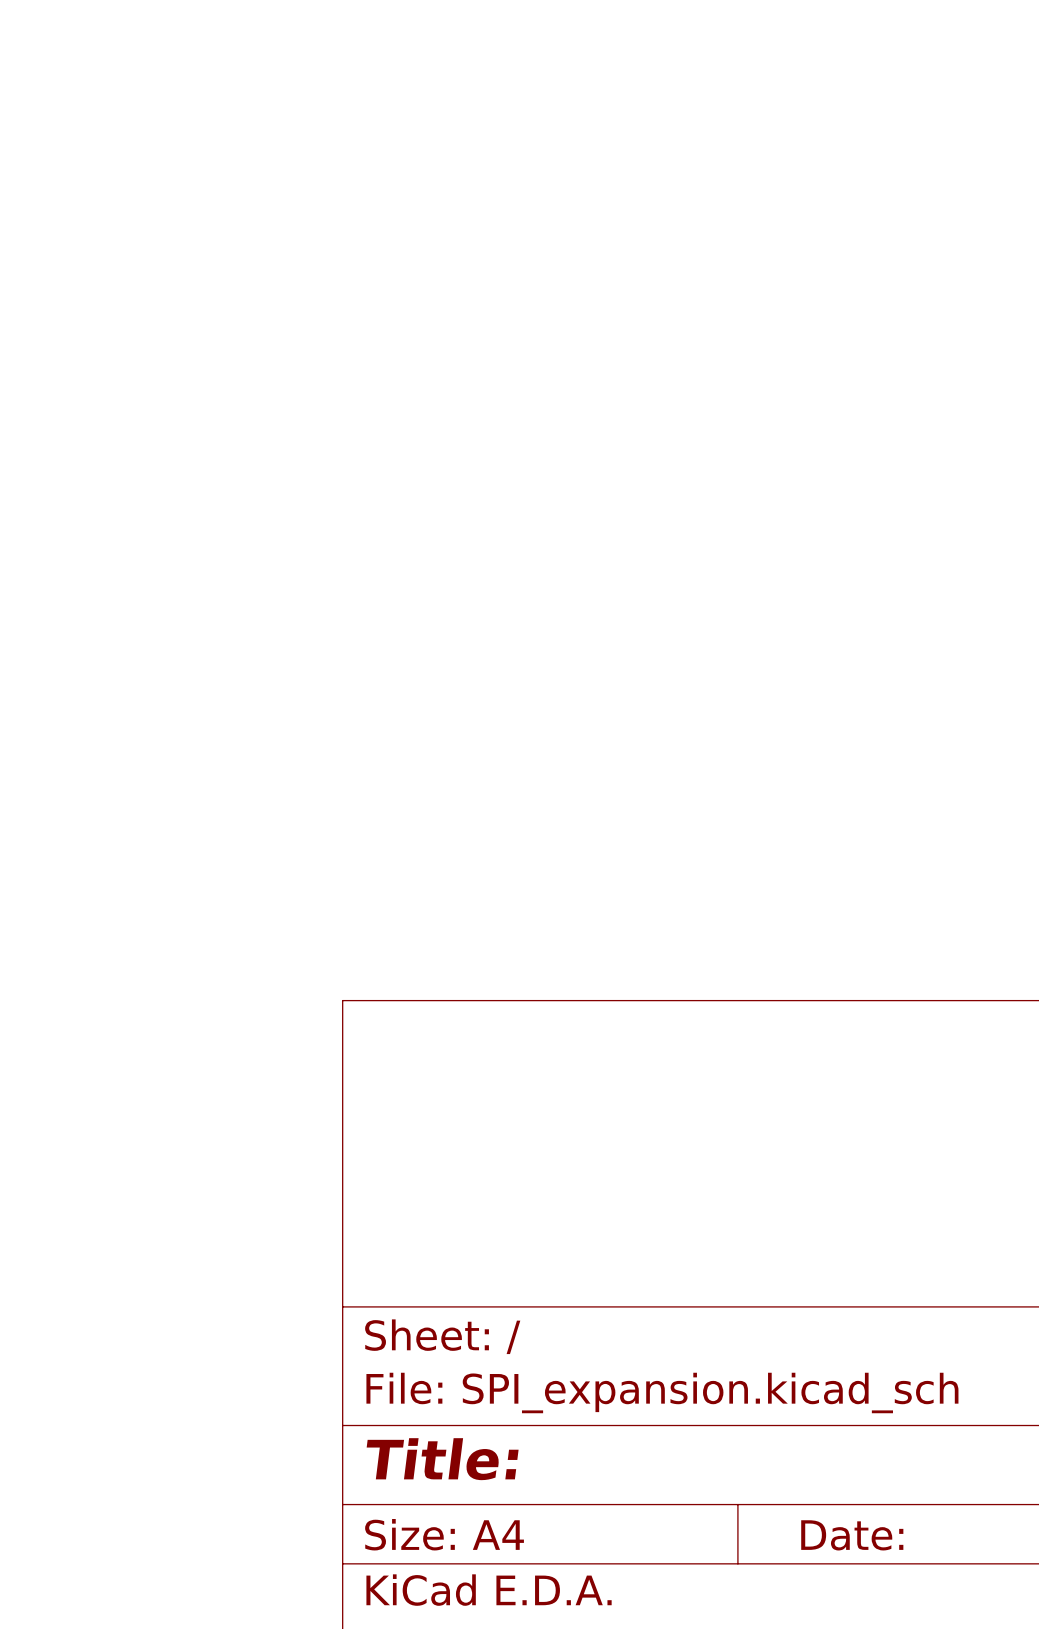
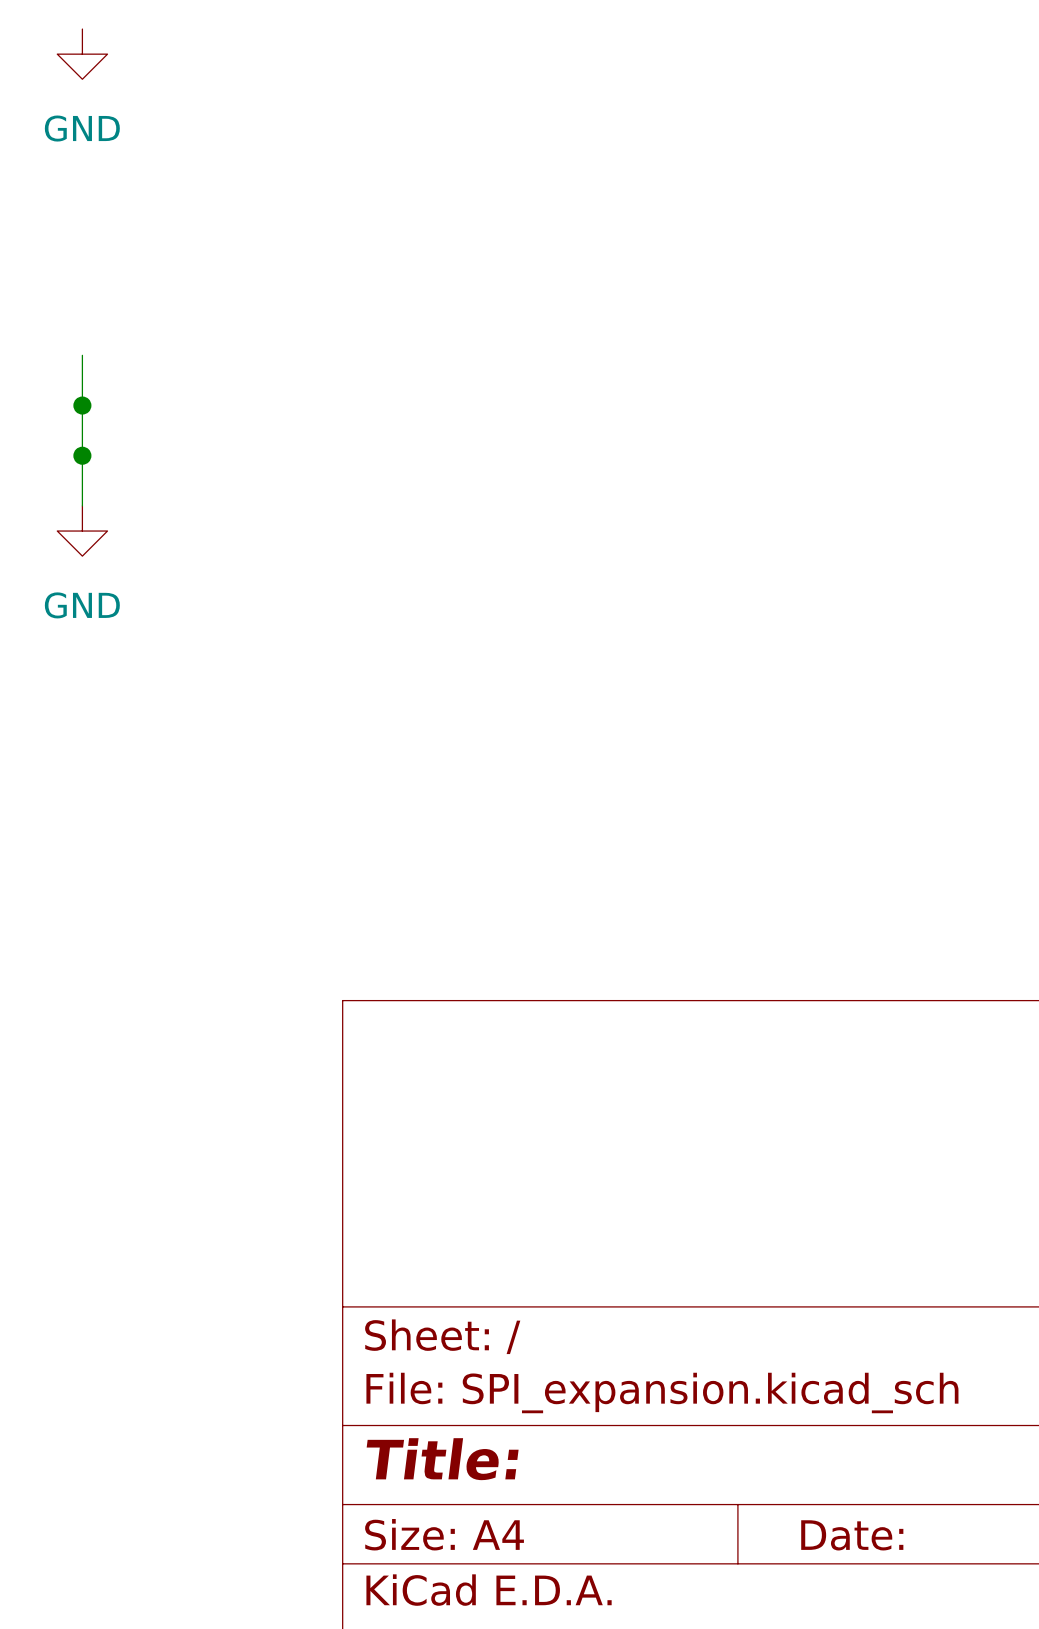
power symbol: none -> GND (82, 54)
wire: none -> (82, 355) (82, 505)
junction: none -> (82, 405)
junction: none -> (82, 455)
power symbol: none -> GND (82, 531)

